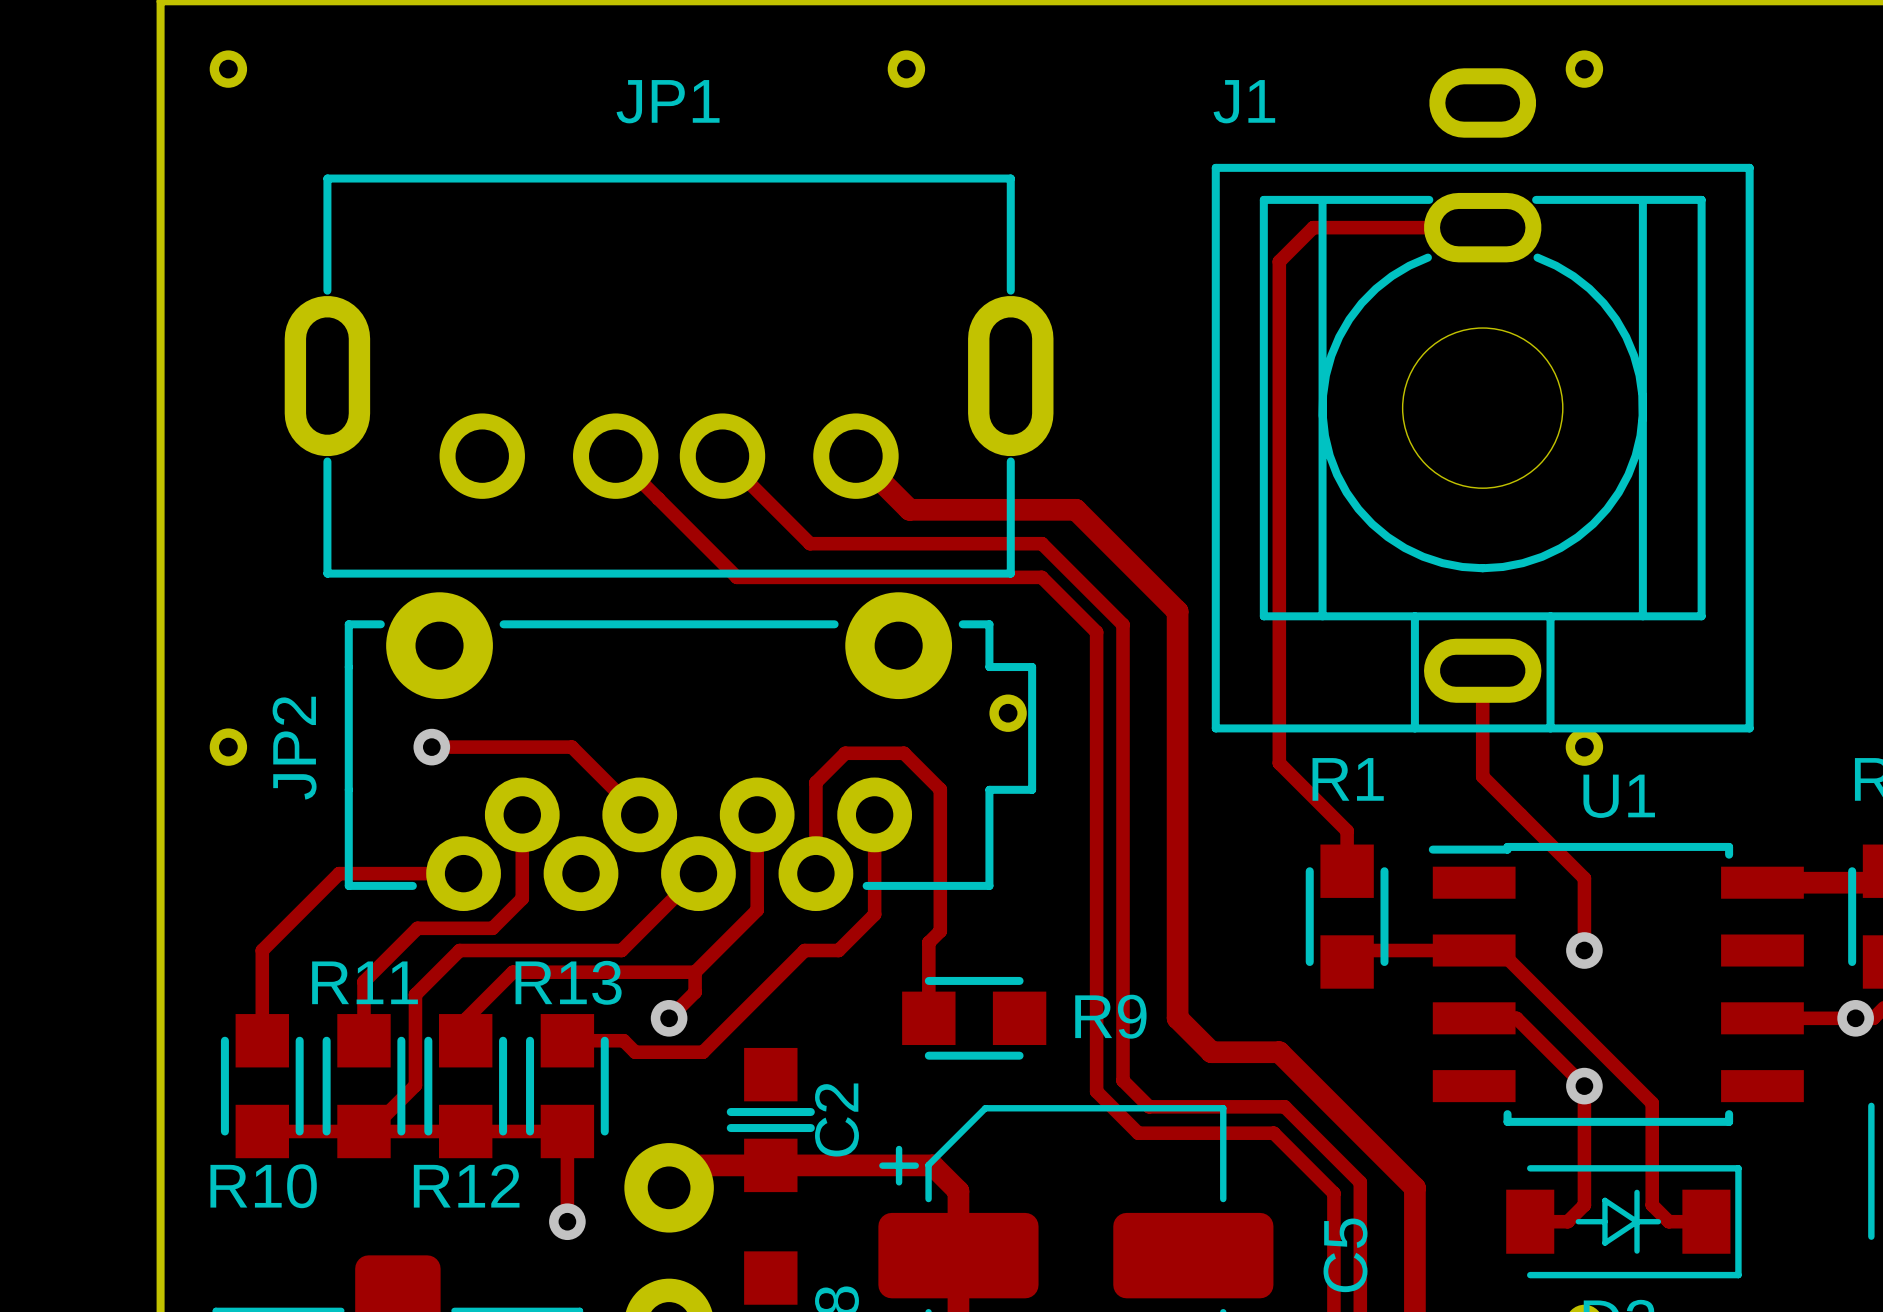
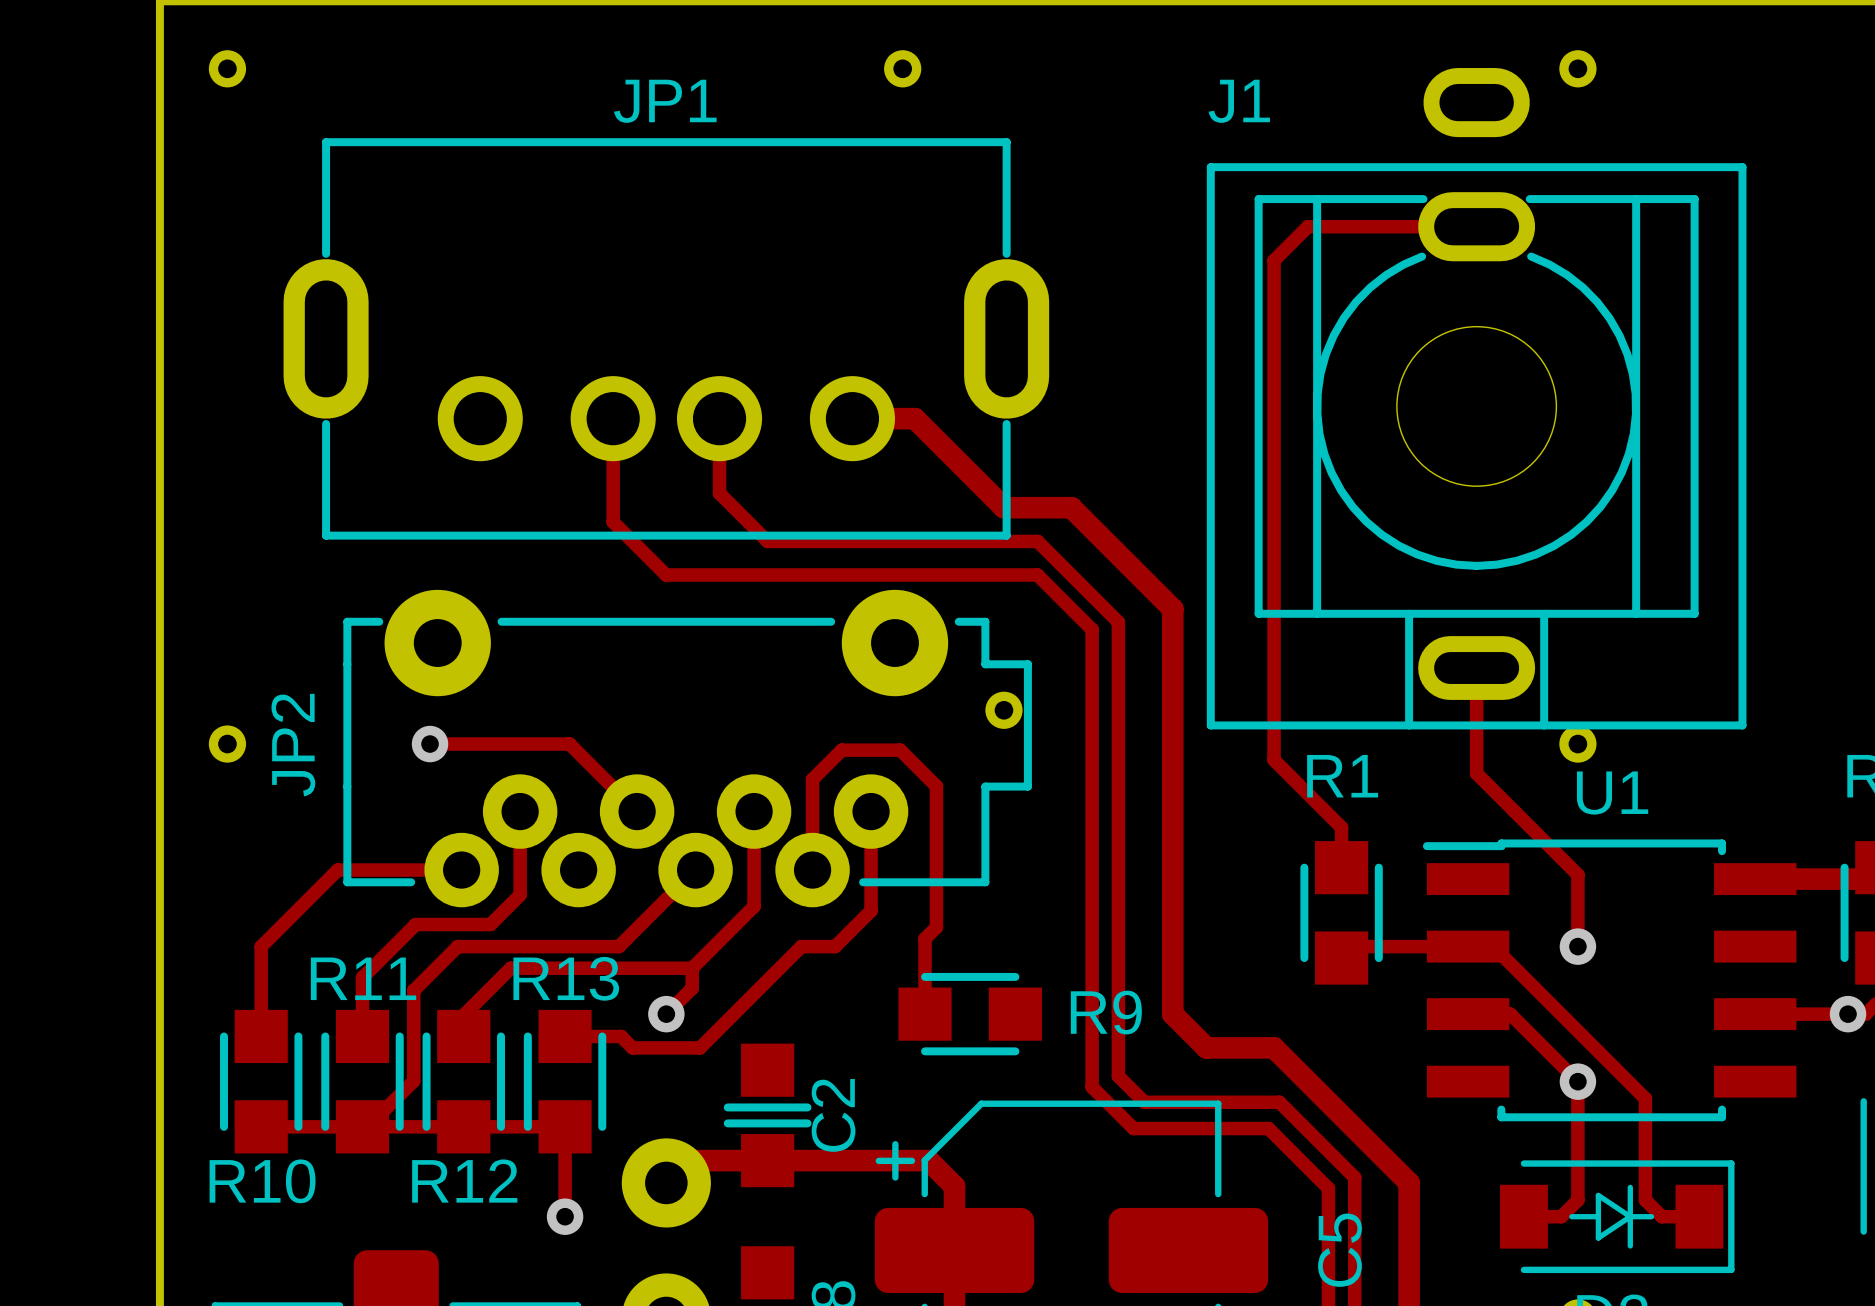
JP1 position: (669, 376) -> (666, 338)
track: (615, 456) (736, 577) -> (613, 418) (613, 522) (666, 575) (733, 575)
track: (722, 456) (810, 543) -> (719, 418) (719, 493) (767, 541) (806, 541)
track: (855, 456) (909, 509) (1008, 509) -> (852, 418) (914, 418) (1003, 507)

